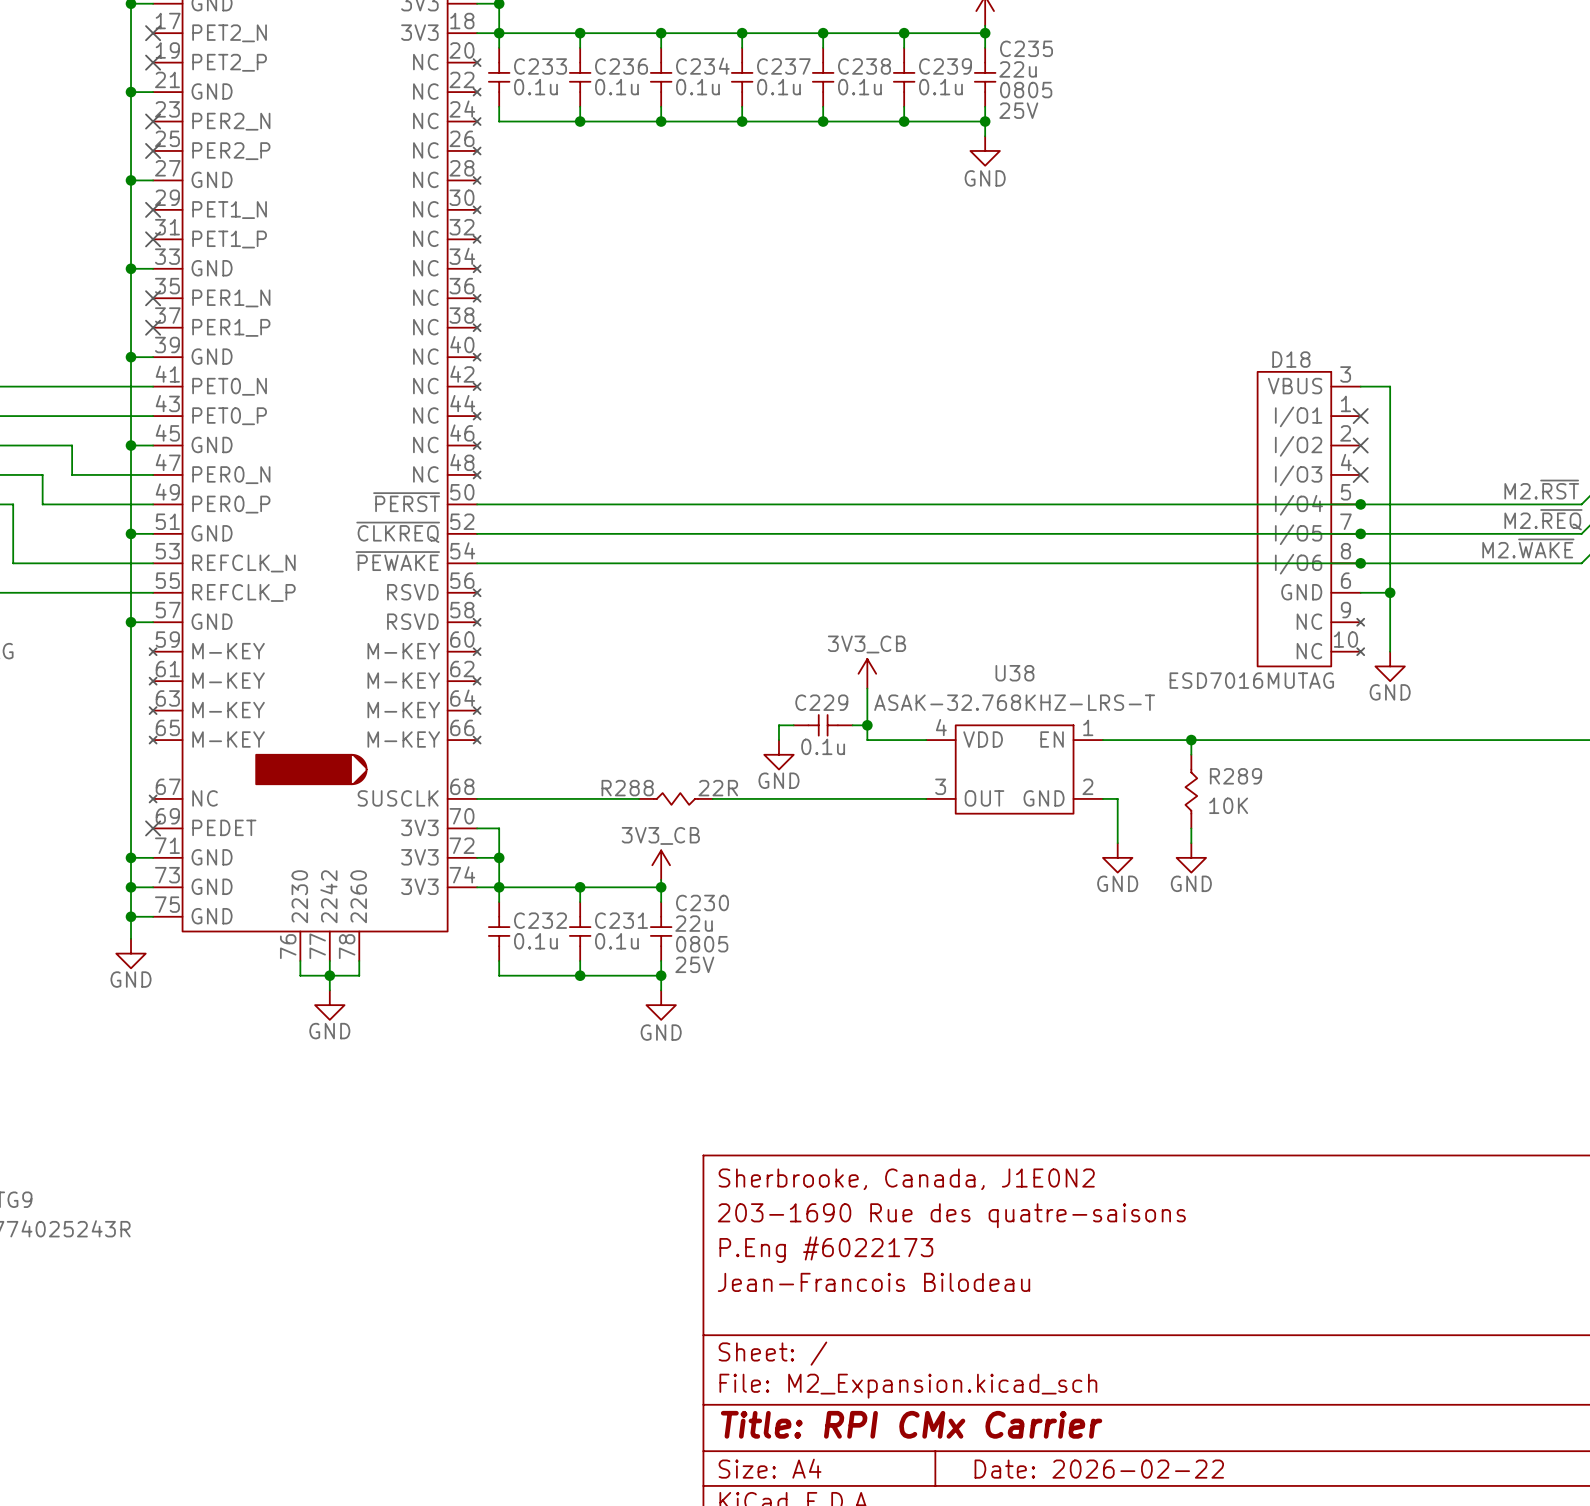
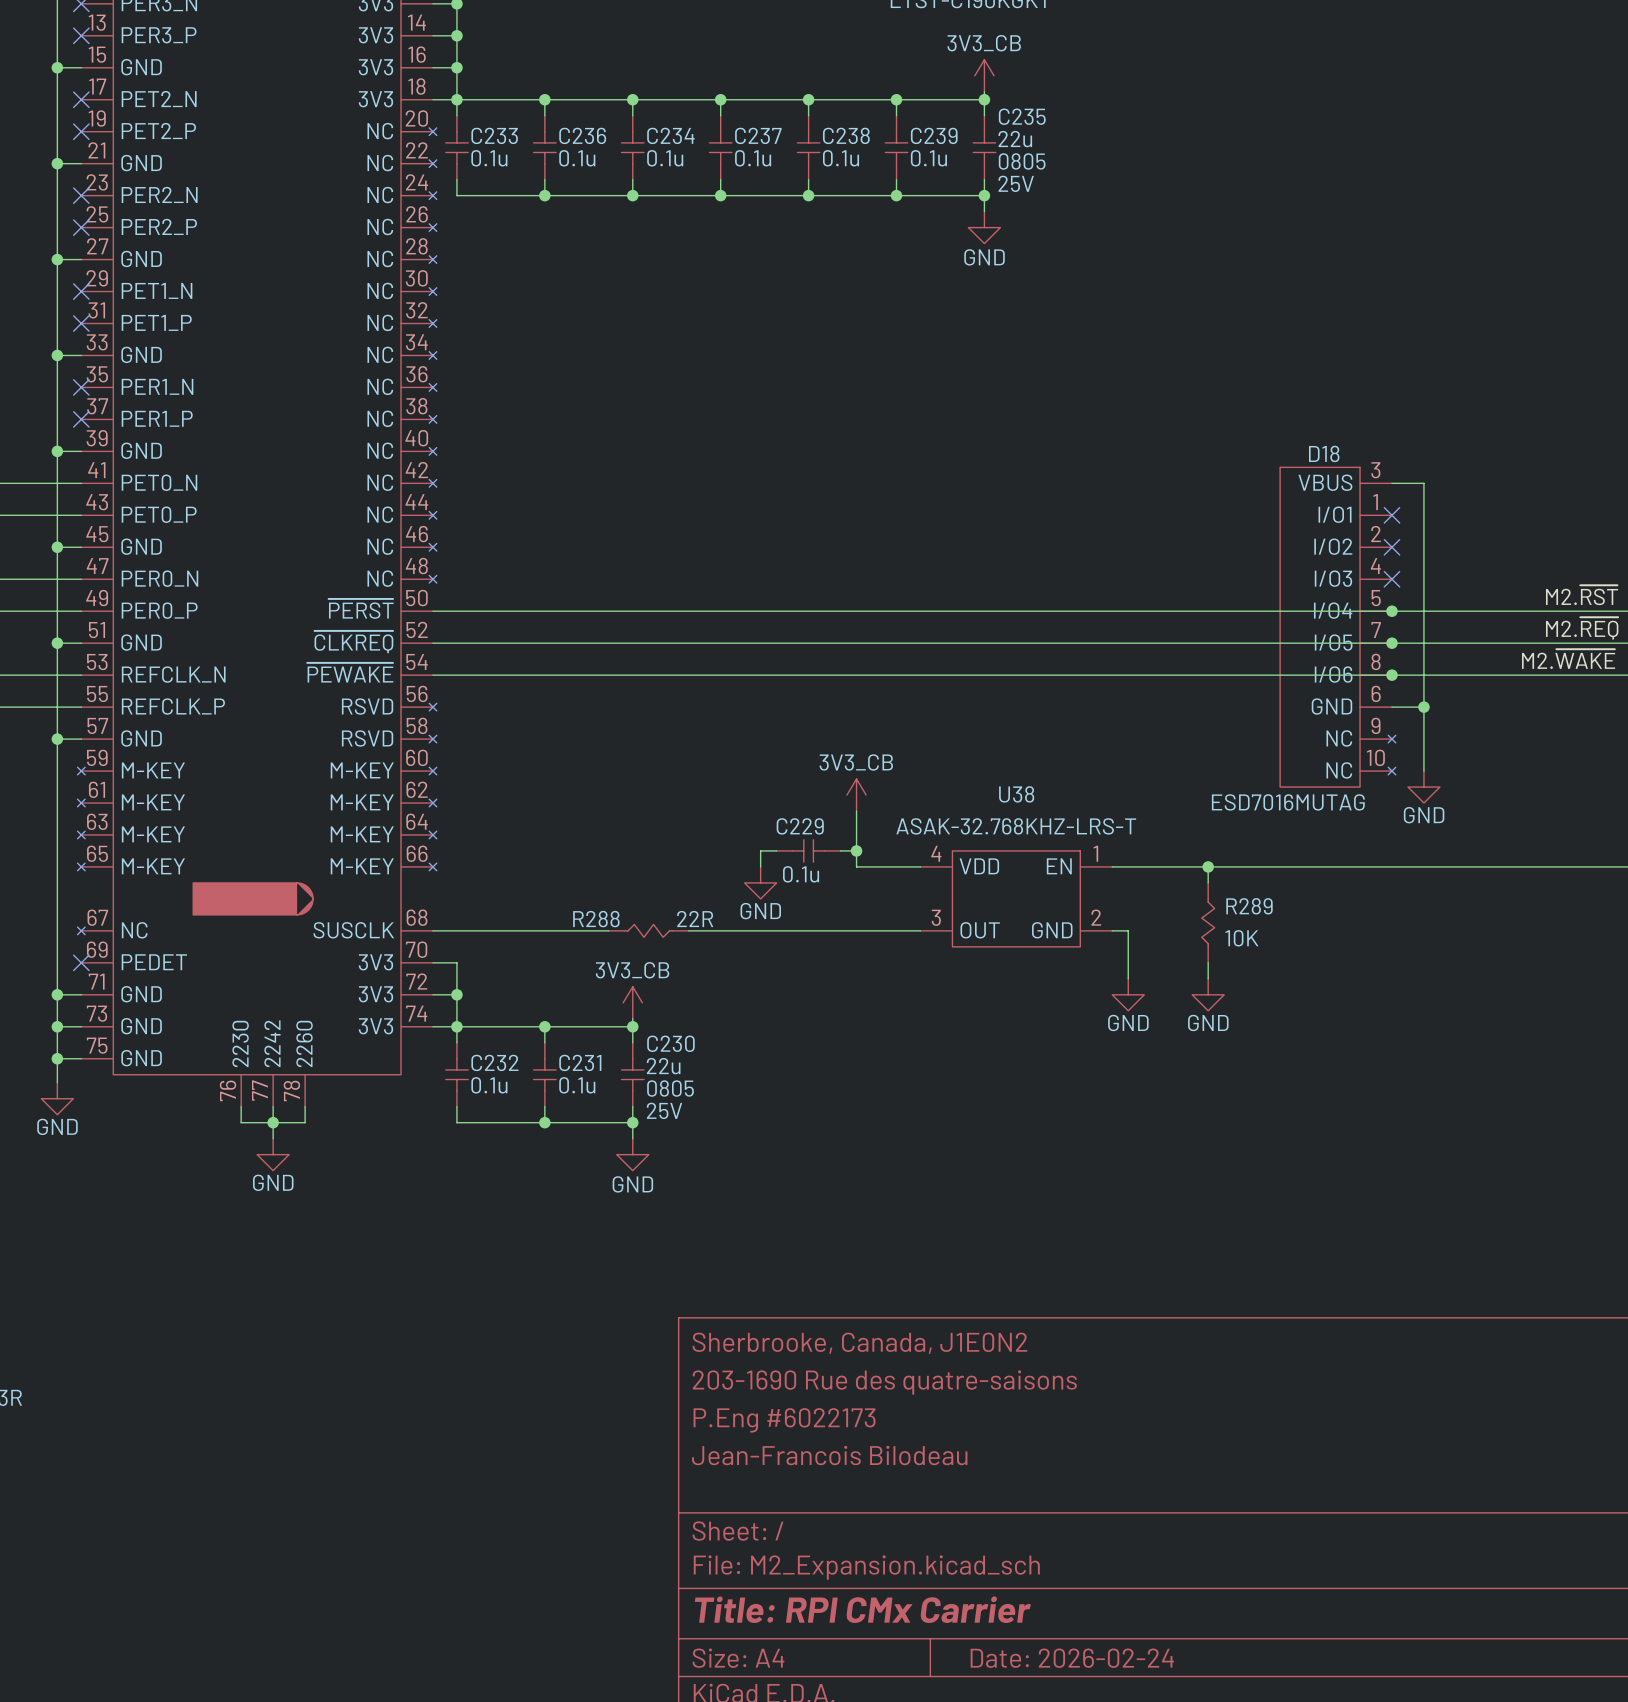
title block: Date: 2026-02-22 (1099, 1469) -> Date: 2026-02-24 (1072, 1658)

